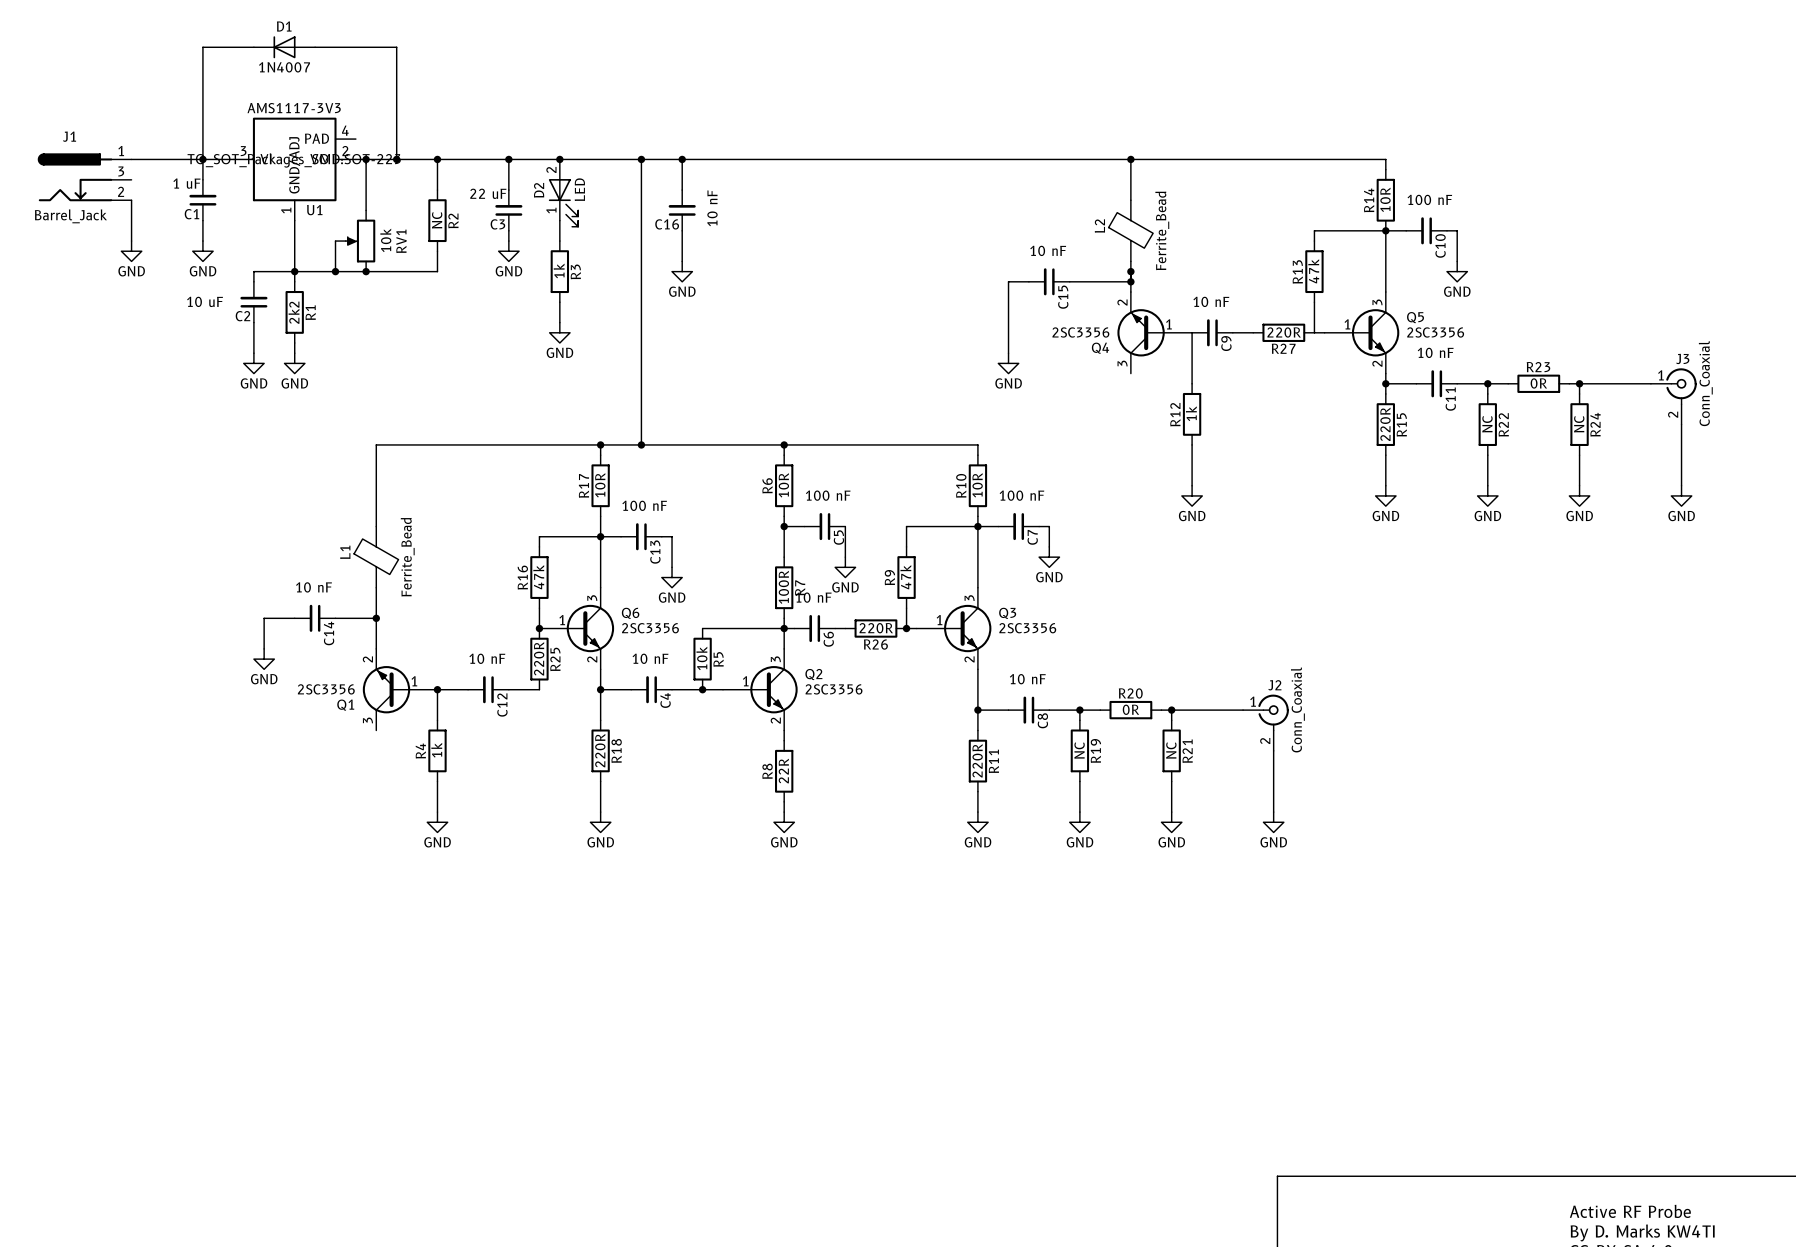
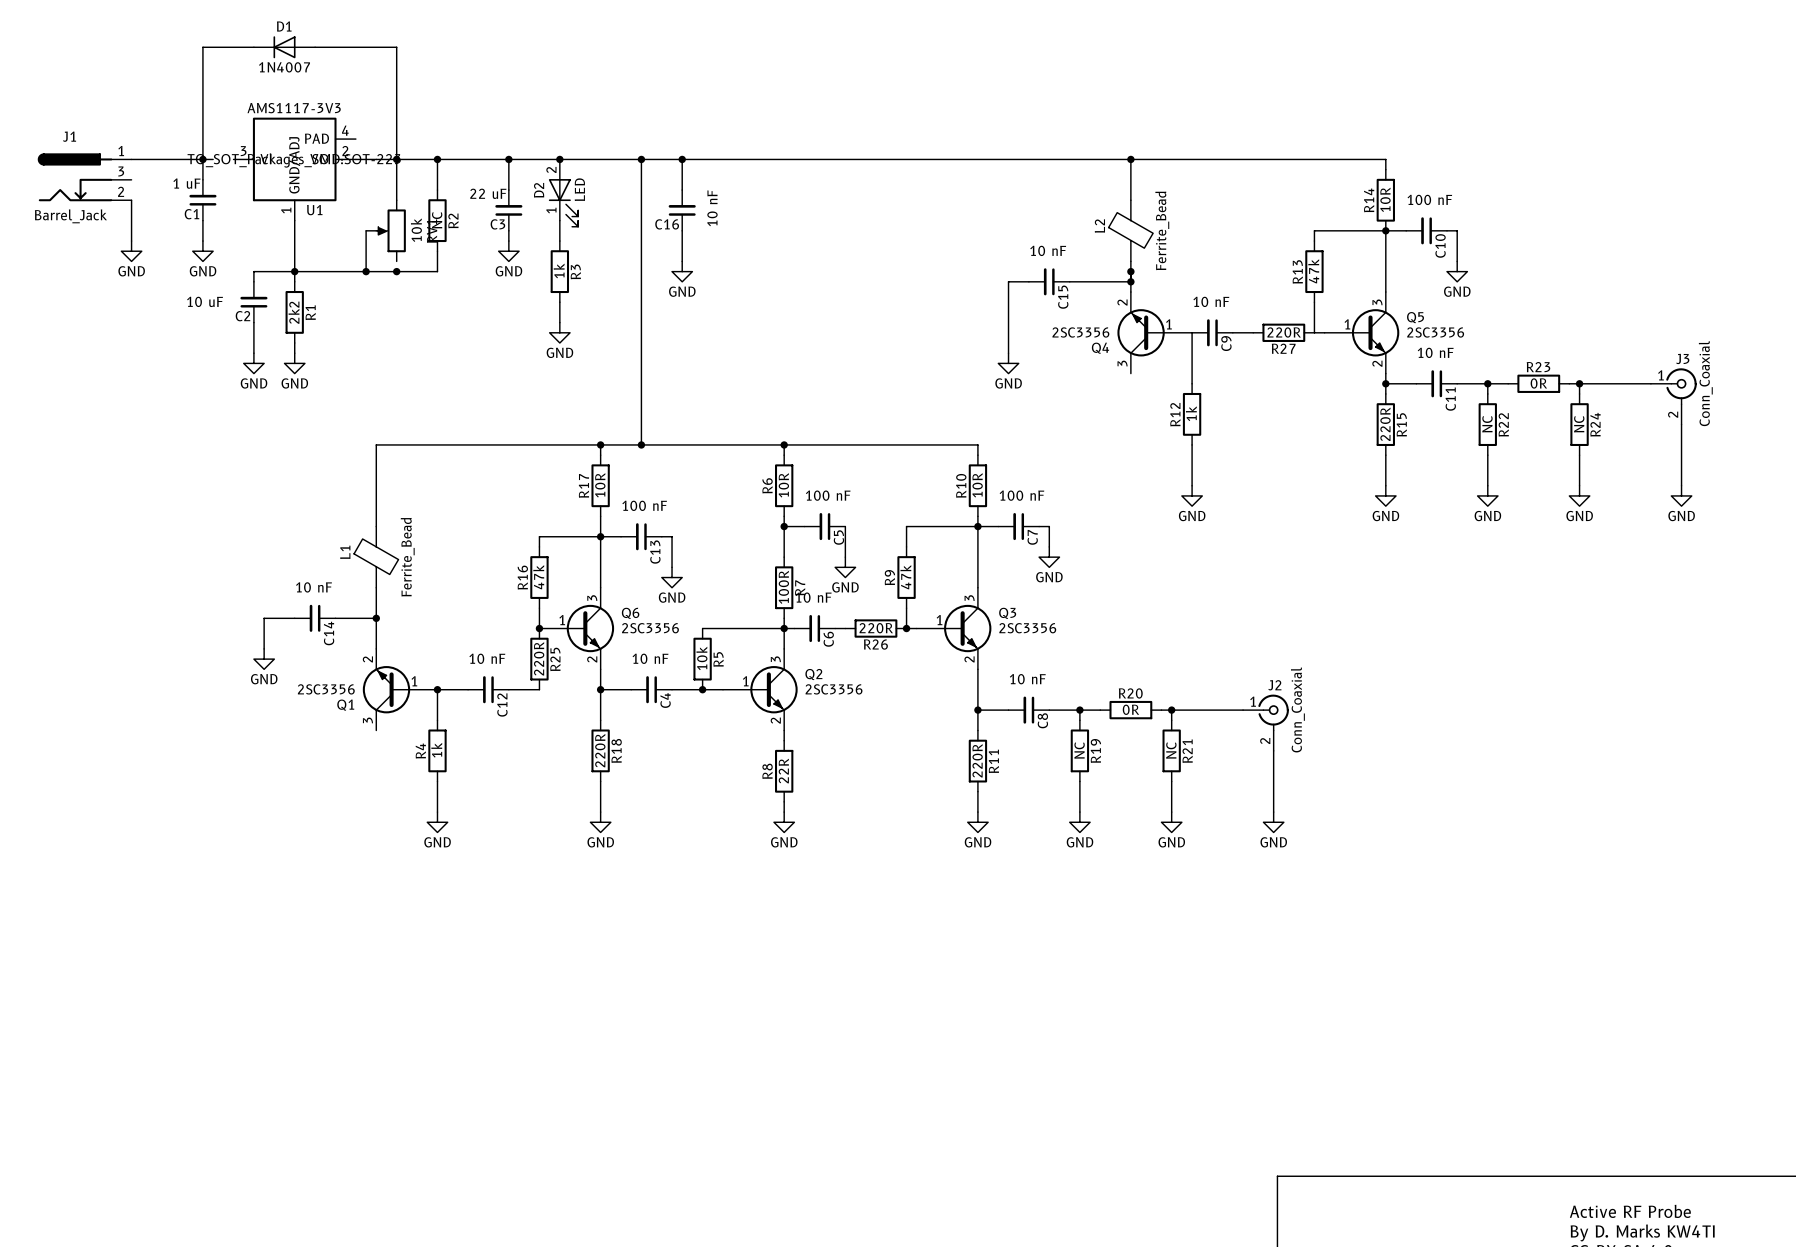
wire: (213, 159) (233, 159) -> none
wire: (366, 159) (366, 210) -> none
junction: (366, 159) -> none
wire: none -> (396, 159) (396, 200)
wire: none -> (366, 230) (366, 271)
wire: (335, 241) (335, 271) -> none
RV1 position: (355, 241) -> (385, 230)
junction: (335, 271) -> none
junction: none -> (396, 271)

